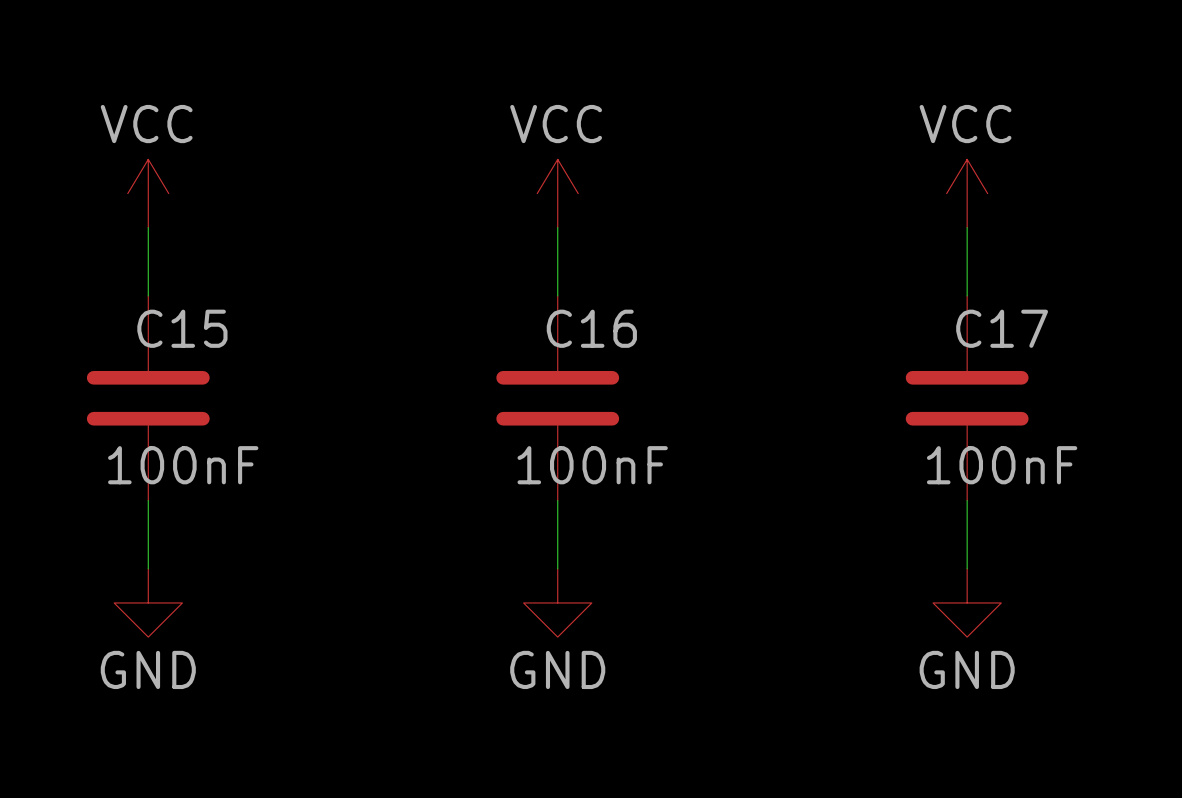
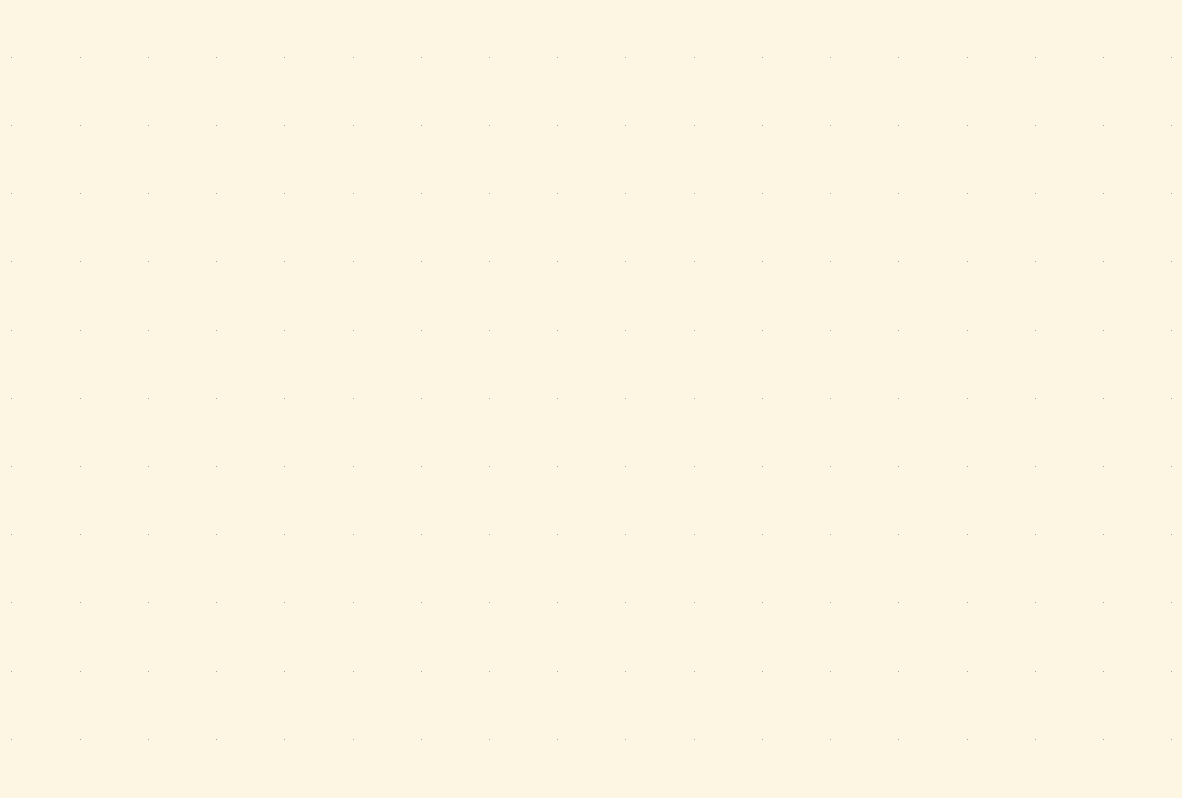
power symbol: VCC (148, 193) -> none
power symbol: VCC (557, 193) -> none
power symbol: VCC (967, 193) -> none
wire: (148, 227) (148, 295) -> none
wire: (557, 227) (557, 295) -> none
wire: (967, 227) (967, 295) -> none
C15: 100nF (148, 398) -> none
C16: 100nF (557, 398) -> none
C17: 100nF (967, 398) -> none
wire: (148, 500) (148, 568) -> none
wire: (557, 500) (557, 568) -> none
wire: (967, 500) (967, 568) -> none
power symbol: GND (148, 602) -> none
power symbol: GND (557, 602) -> none
power symbol: GND (967, 602) -> none

